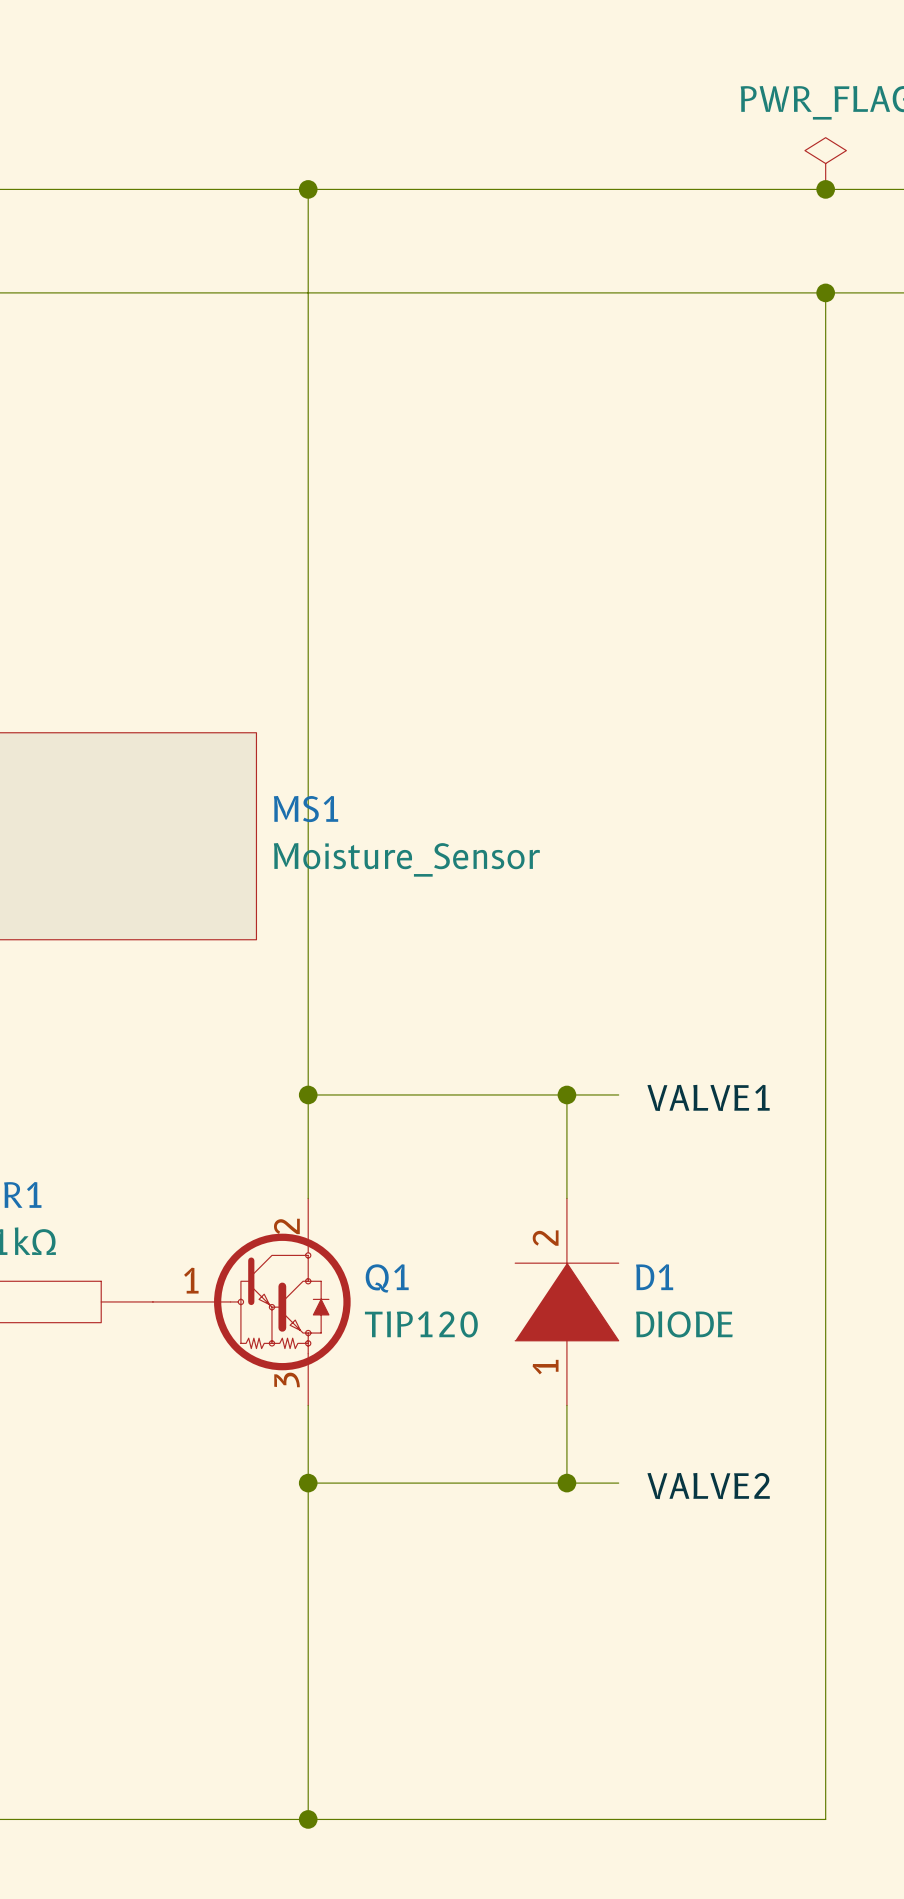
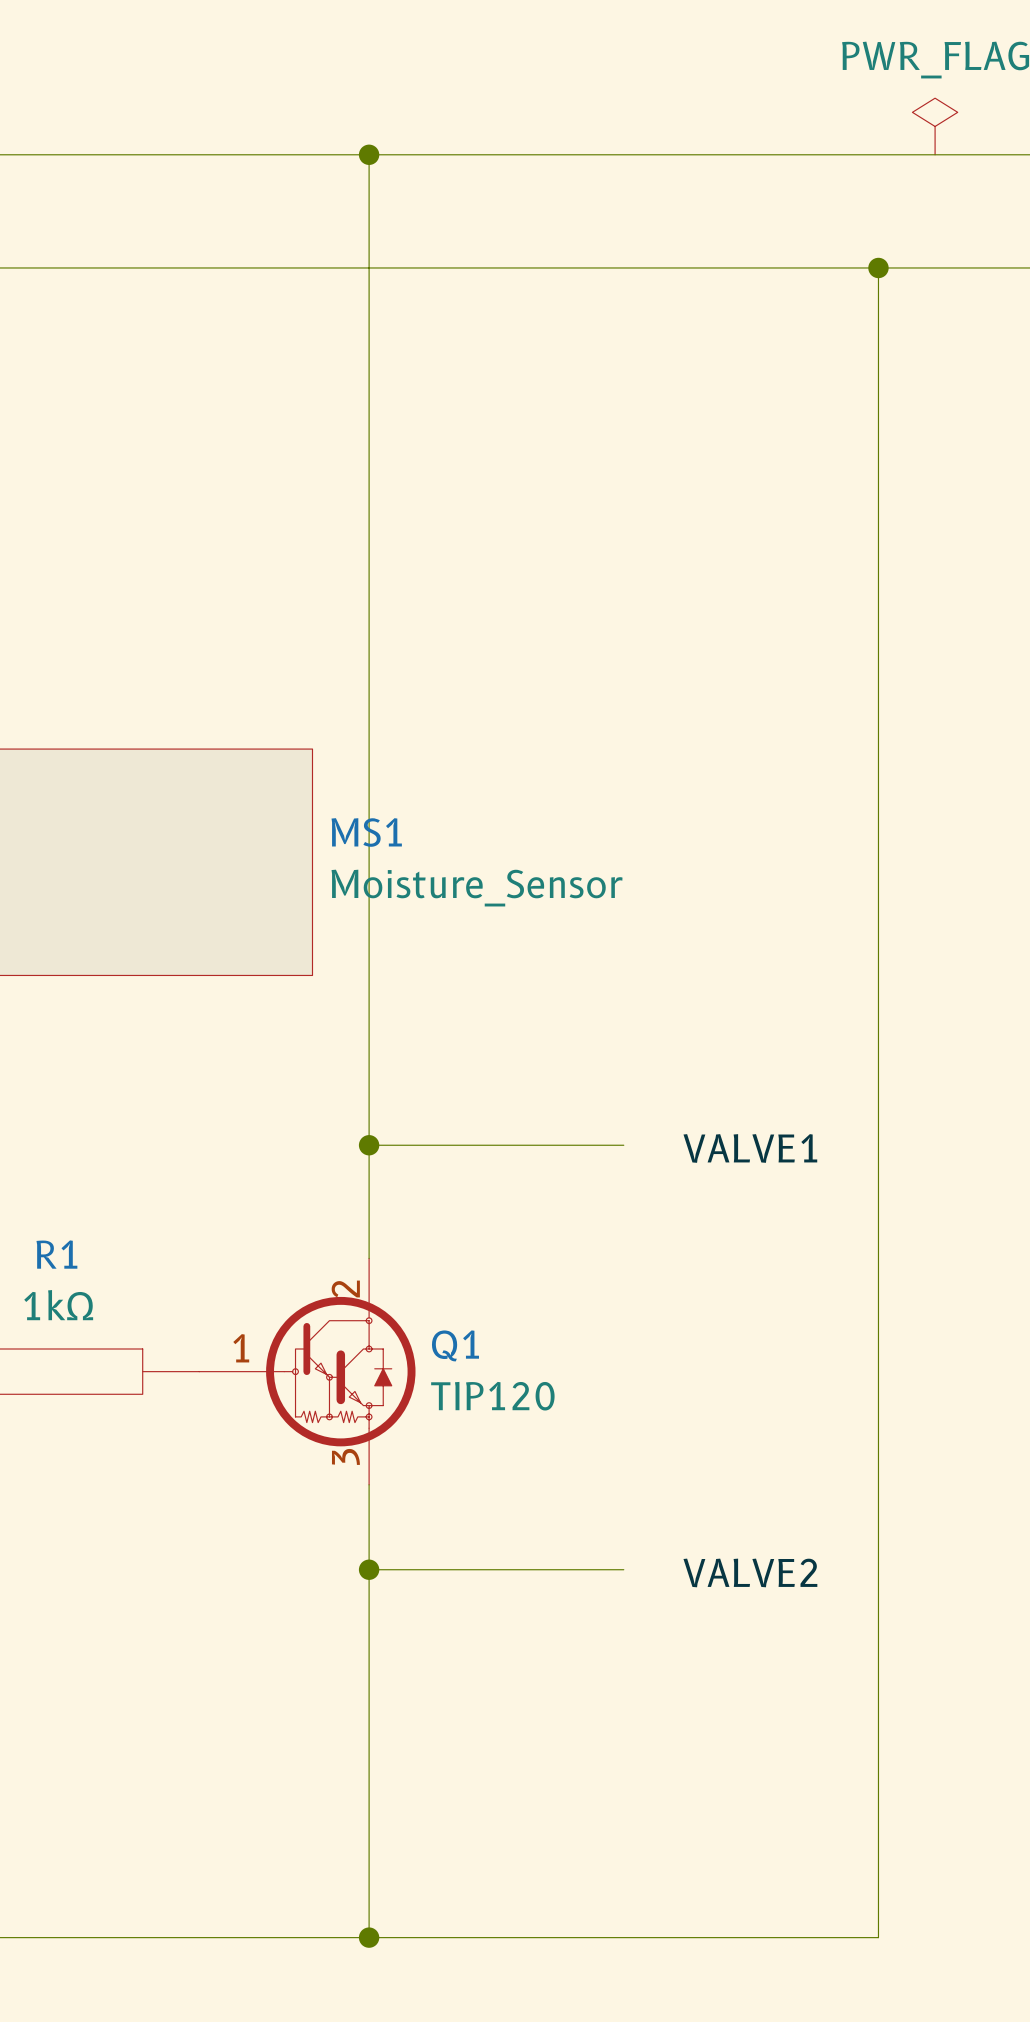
junction: (825, 189) -> none
wire: (825, 292) (825, 1819) (773, 1819) -> (878, 267) (878, 1937)
junction position: (825, 292) -> (878, 267)
wire: (541, 1094) (618, 1094) -> none
wire: (566, 1094) (566, 1198) -> none
junction: (566, 1094) -> none
label position: VALVE1 (708, 1097) -> VALVE1 (750, 1148)
D1: DIODE (566, 1301) -> none
wire: (566, 1405) (566, 1483) -> none
wire: (541, 1483) (618, 1483) -> none
junction: (566, 1483) -> none
label position: VALVE2 (708, 1486) -> VALVE2 (750, 1572)

